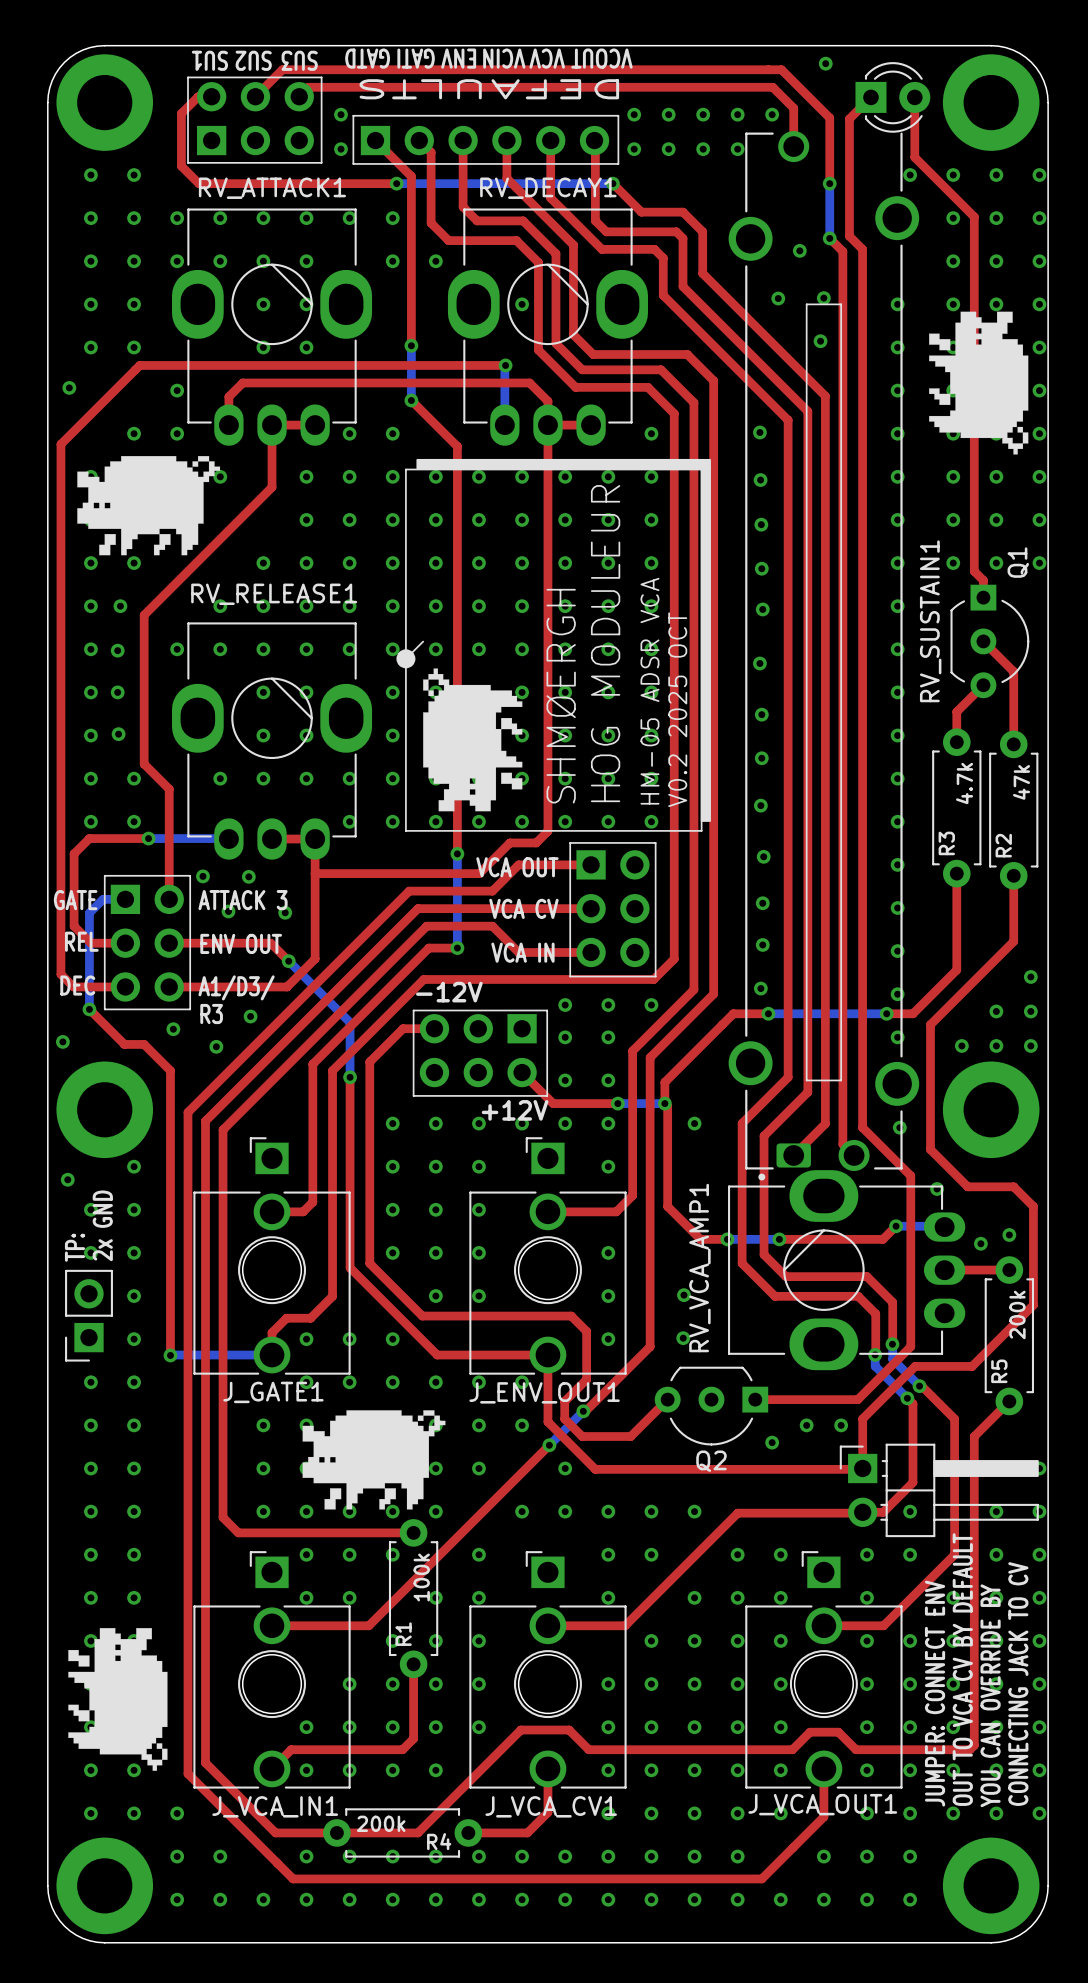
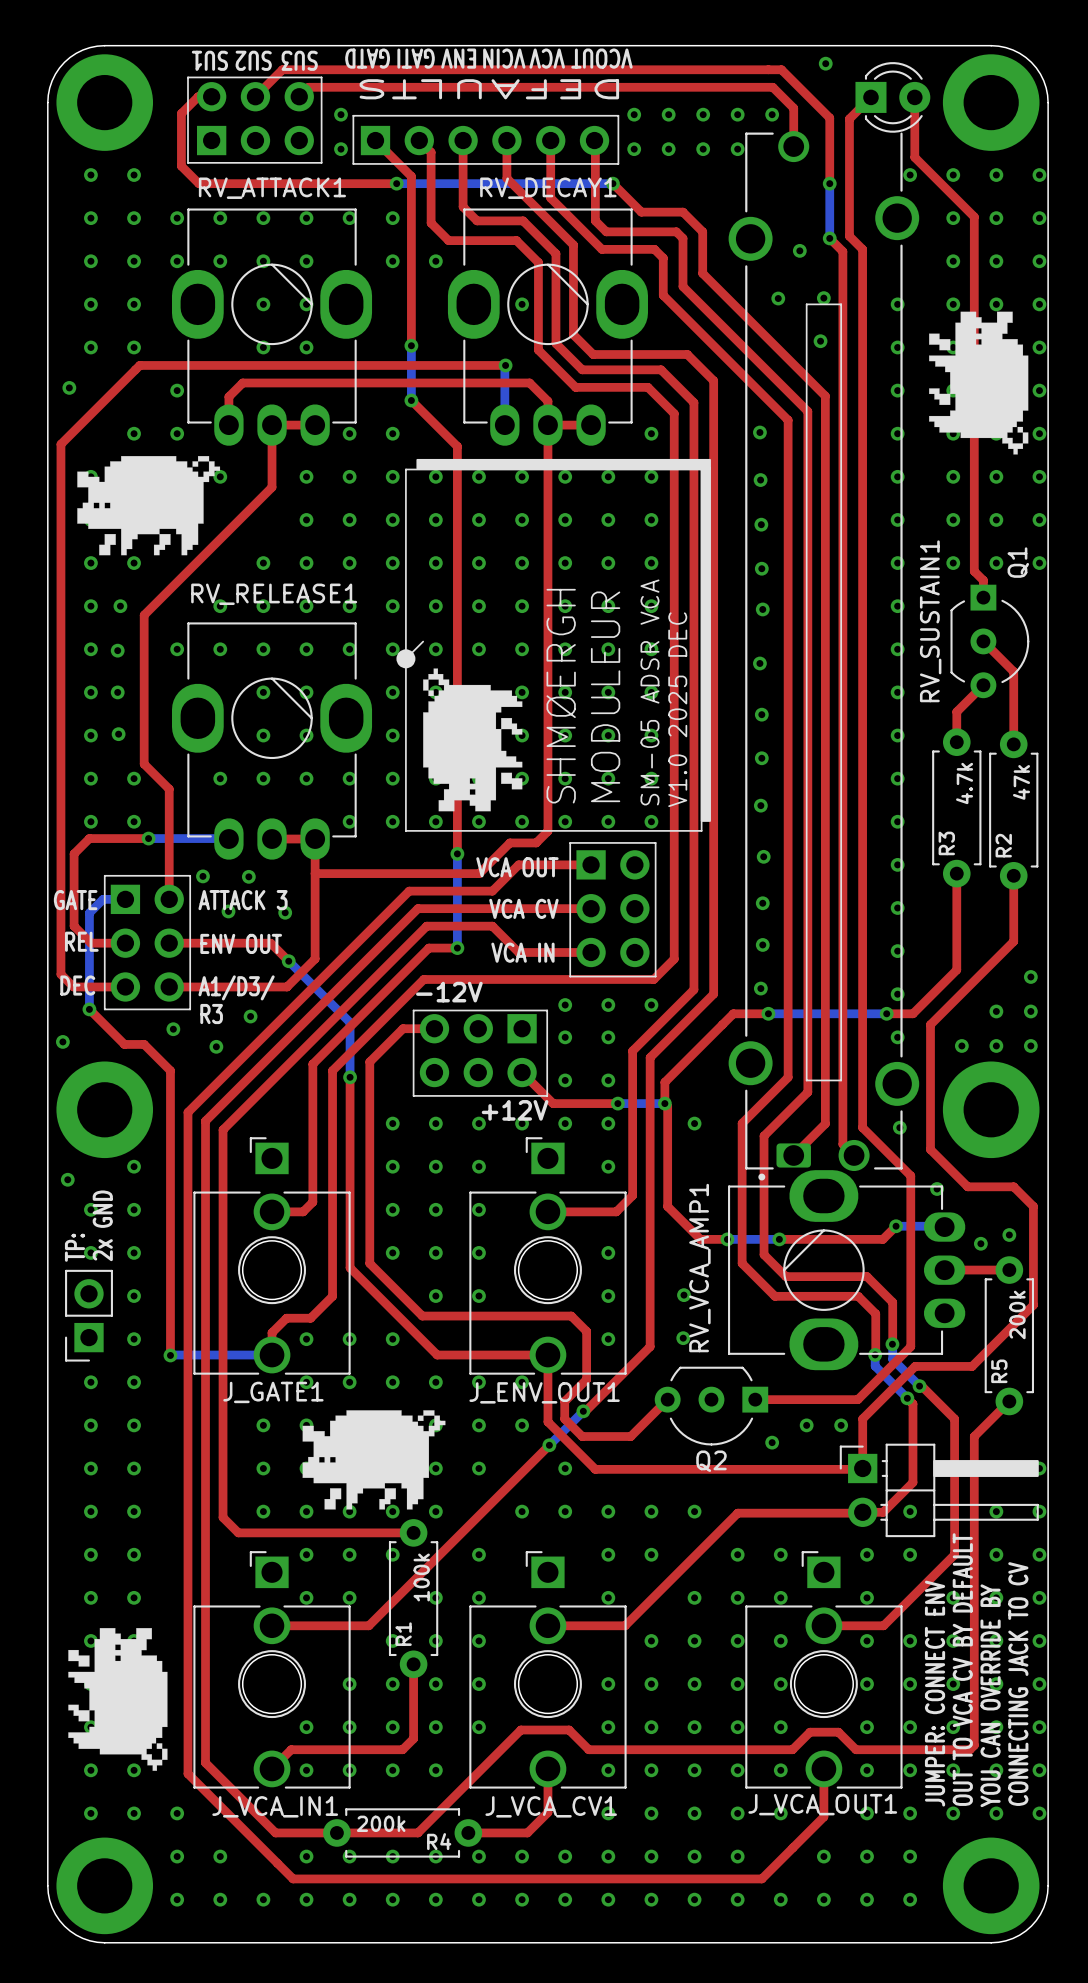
text: HOG MODULEUR (605, 643) -> MODULEUR (605, 696)
text: HM-05 ADSR VCA (649, 691) -> SM-05 ADSR VCA (649, 692)
text: V0.2 2025 OCT (677, 709) -> V1.0 2025 DEC (677, 709)

